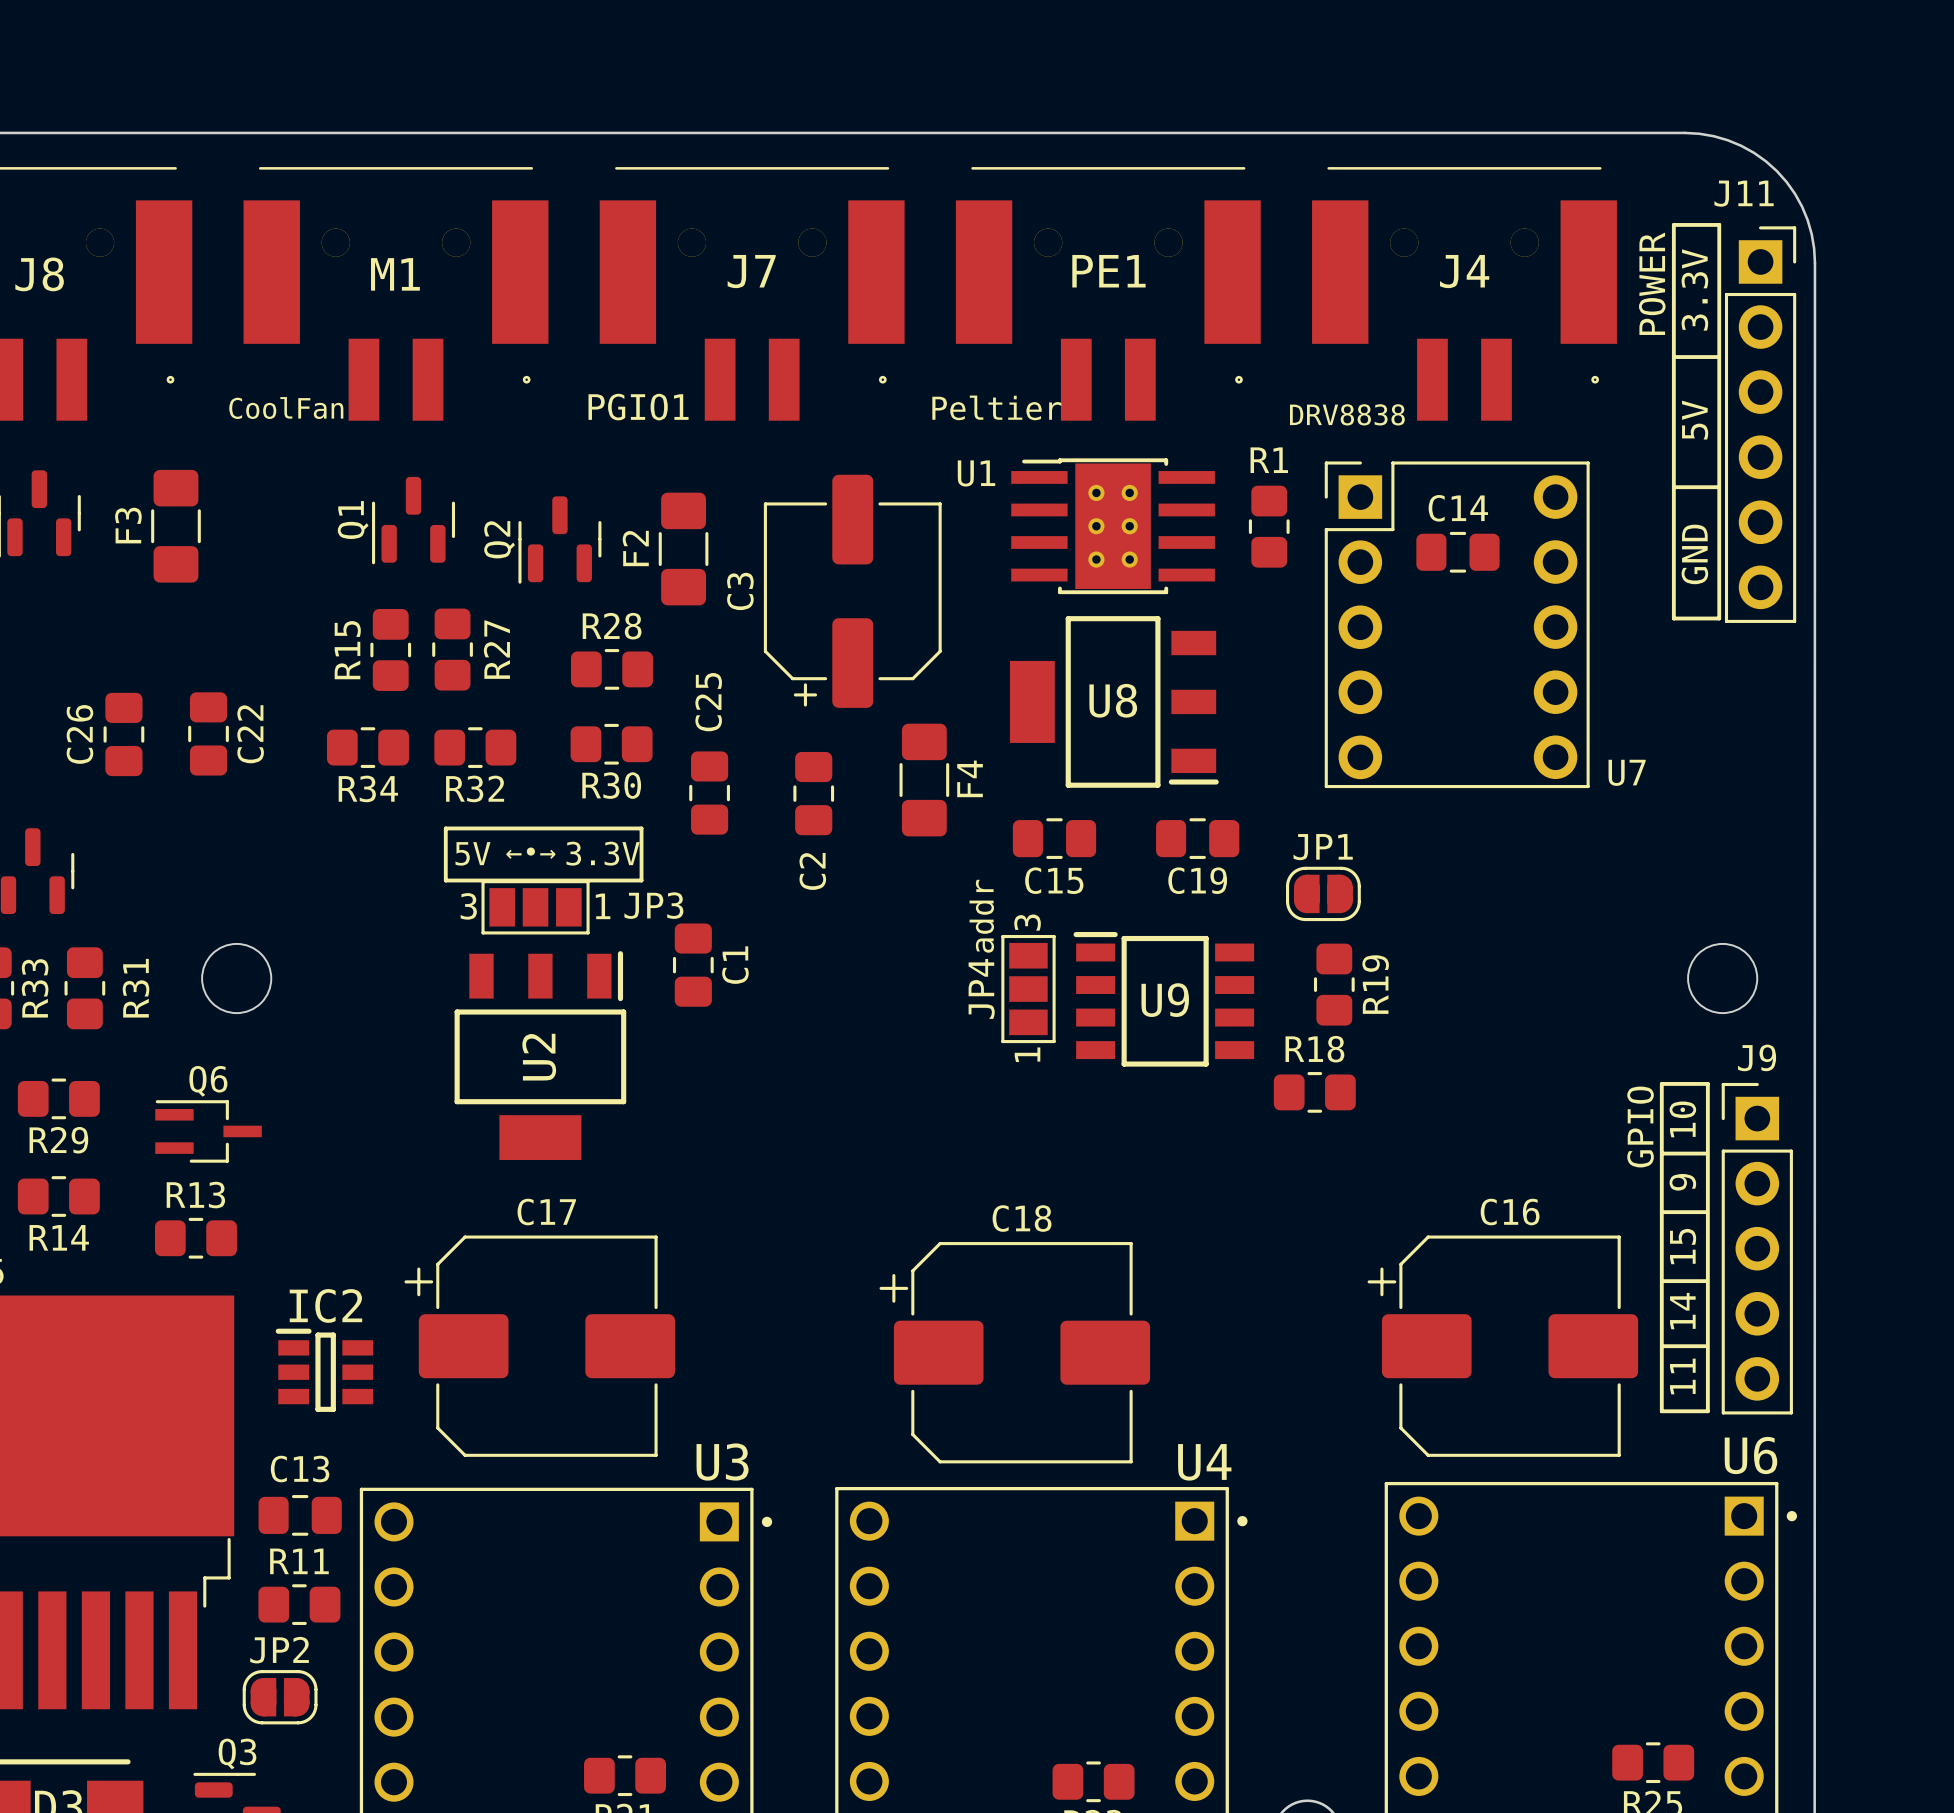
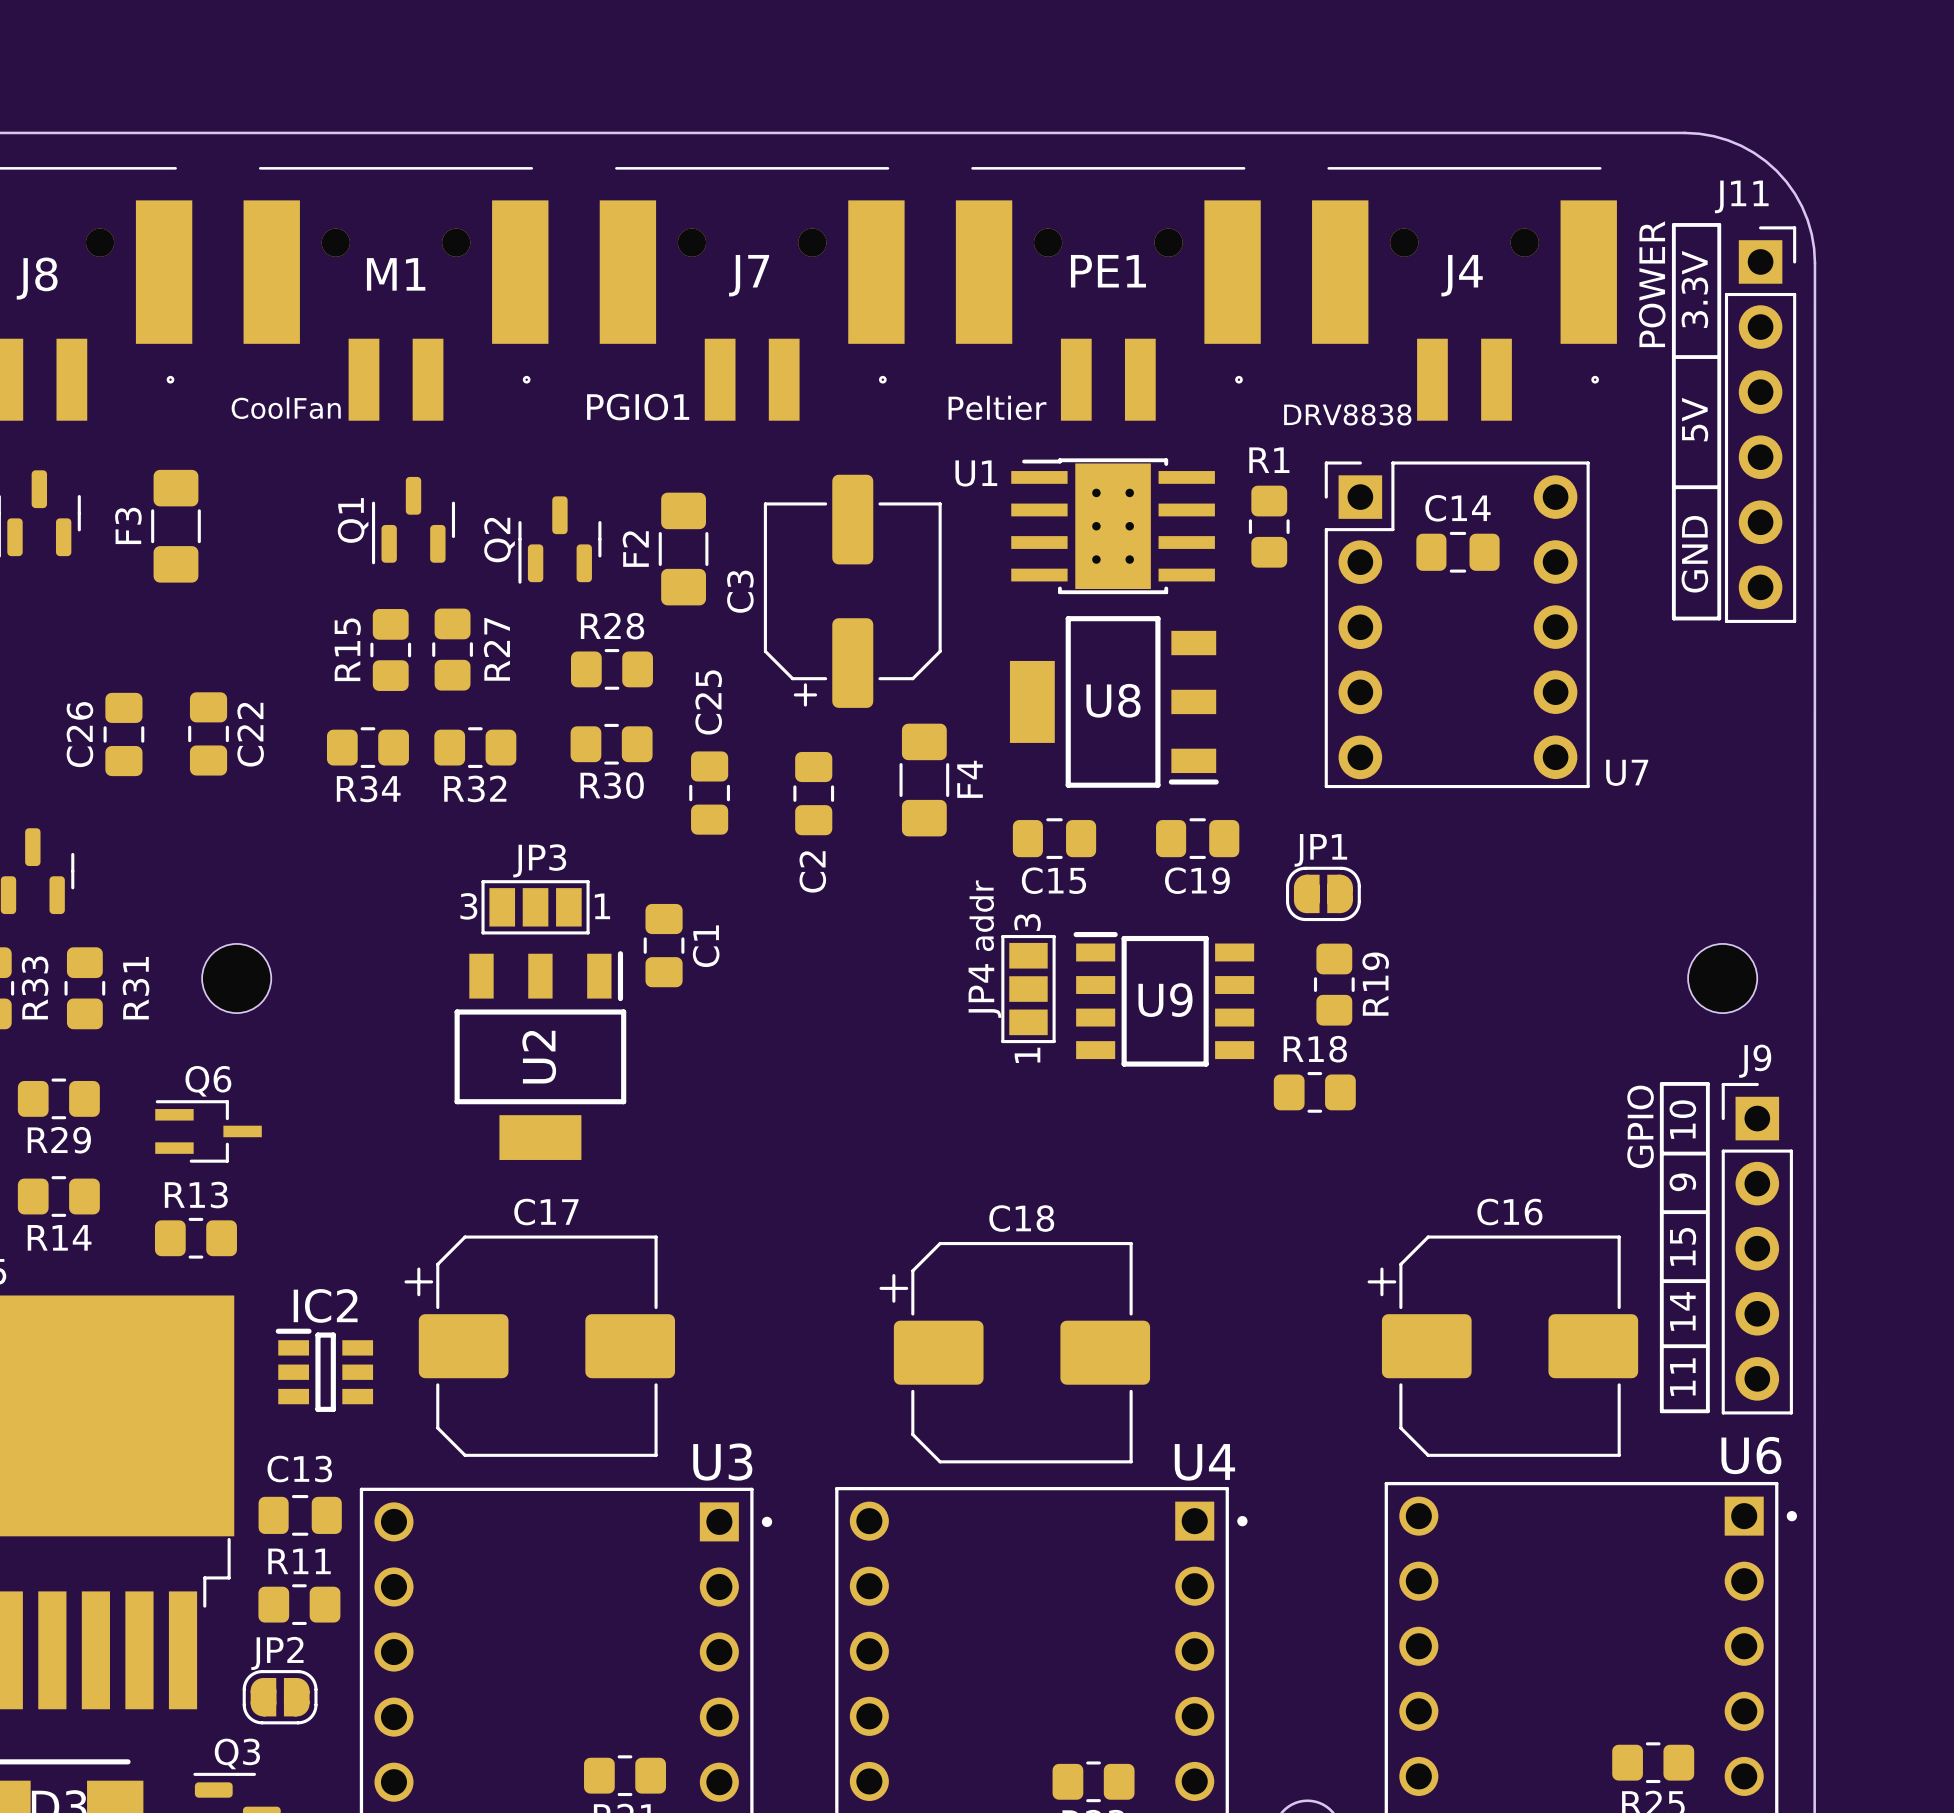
line: (445, 828) (641, 828) (641, 880) (445, 880) (445, 828) -> none
text: 5V (473, 853) -> none
text: ←•→ (530, 853) -> none
text: 3.3V (603, 853) -> none
JP3 name position: JP3 (653, 905) -> JP3 (539, 860)
C1 position: (693, 965) -> (664, 945)

